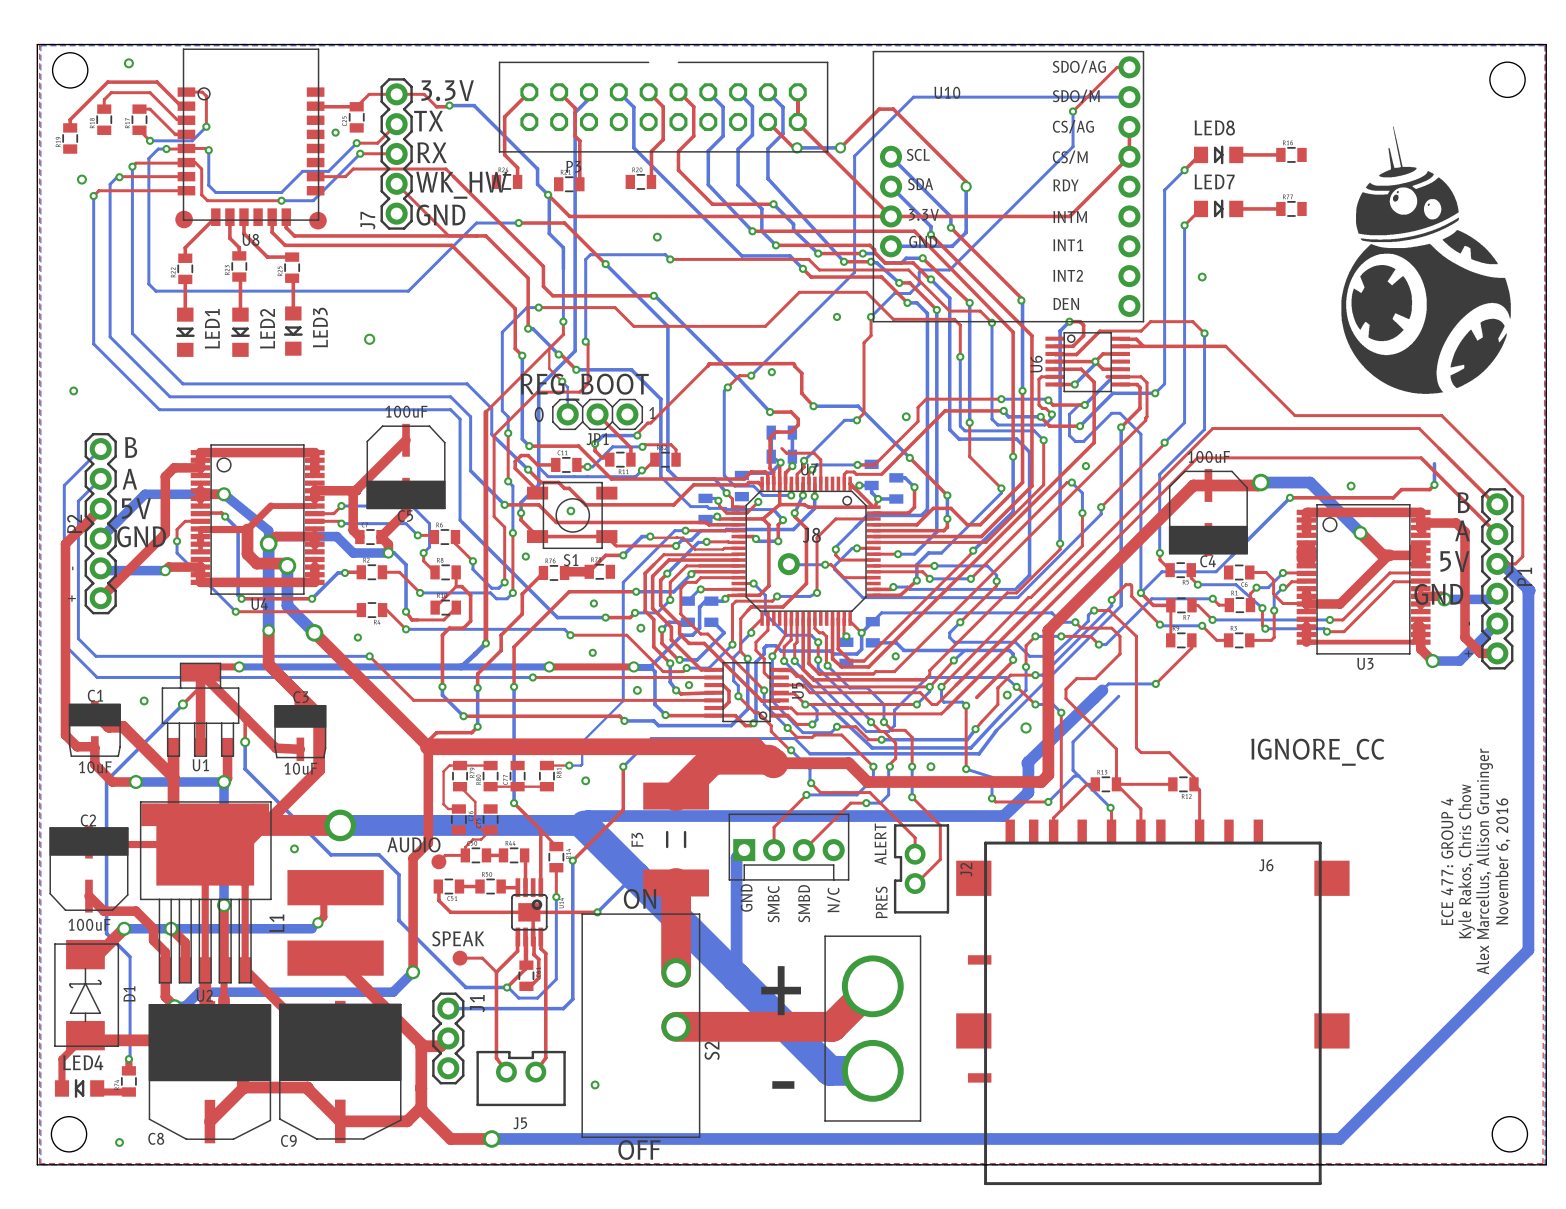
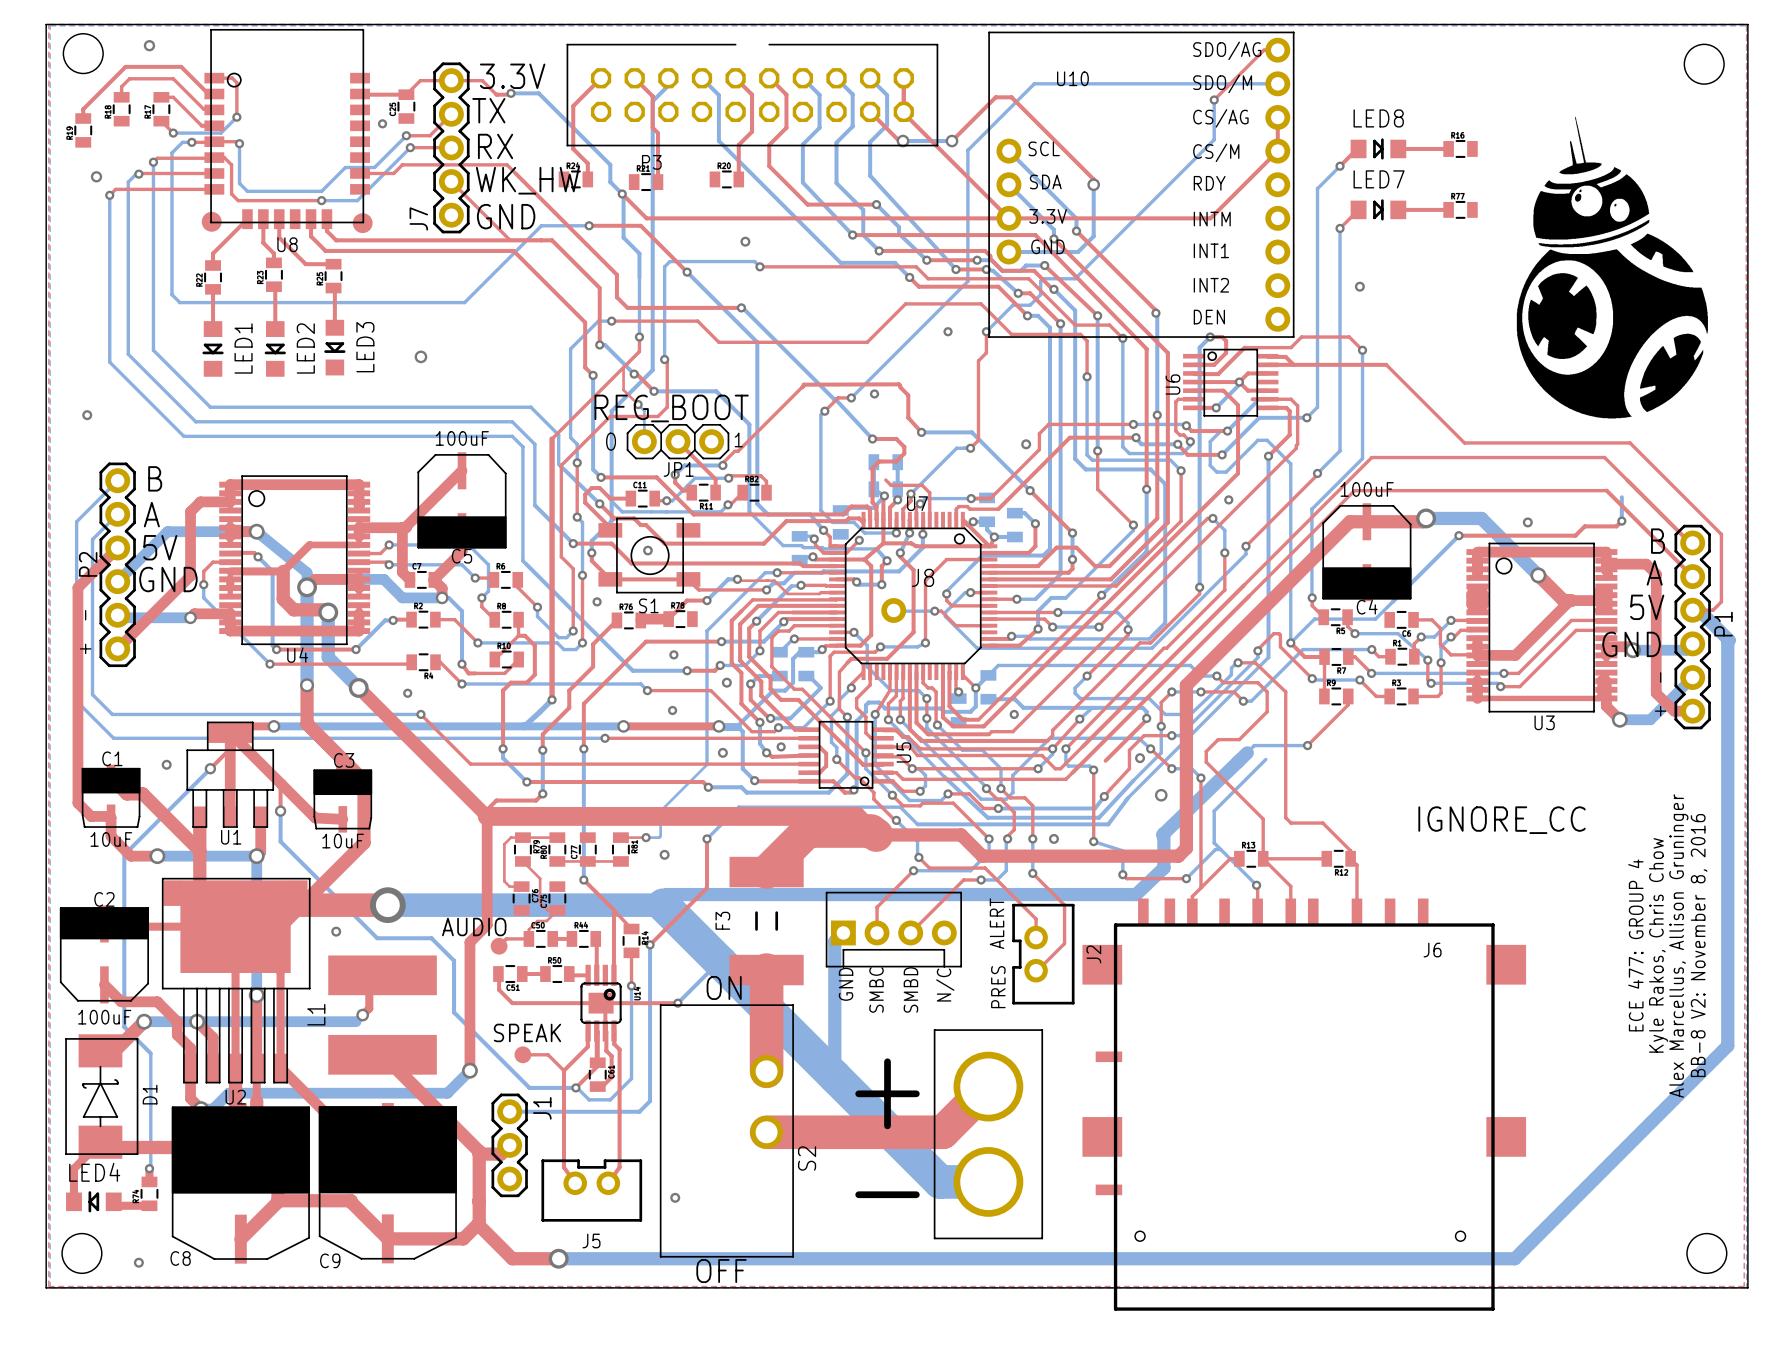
J6 footprint: [956, 819, 1350, 1186] -> [1082, 898, 1527, 1311]
text: November 6, 2016 (1502, 861) -> BB-8 V2: November 8, 2016 (1699, 945)

